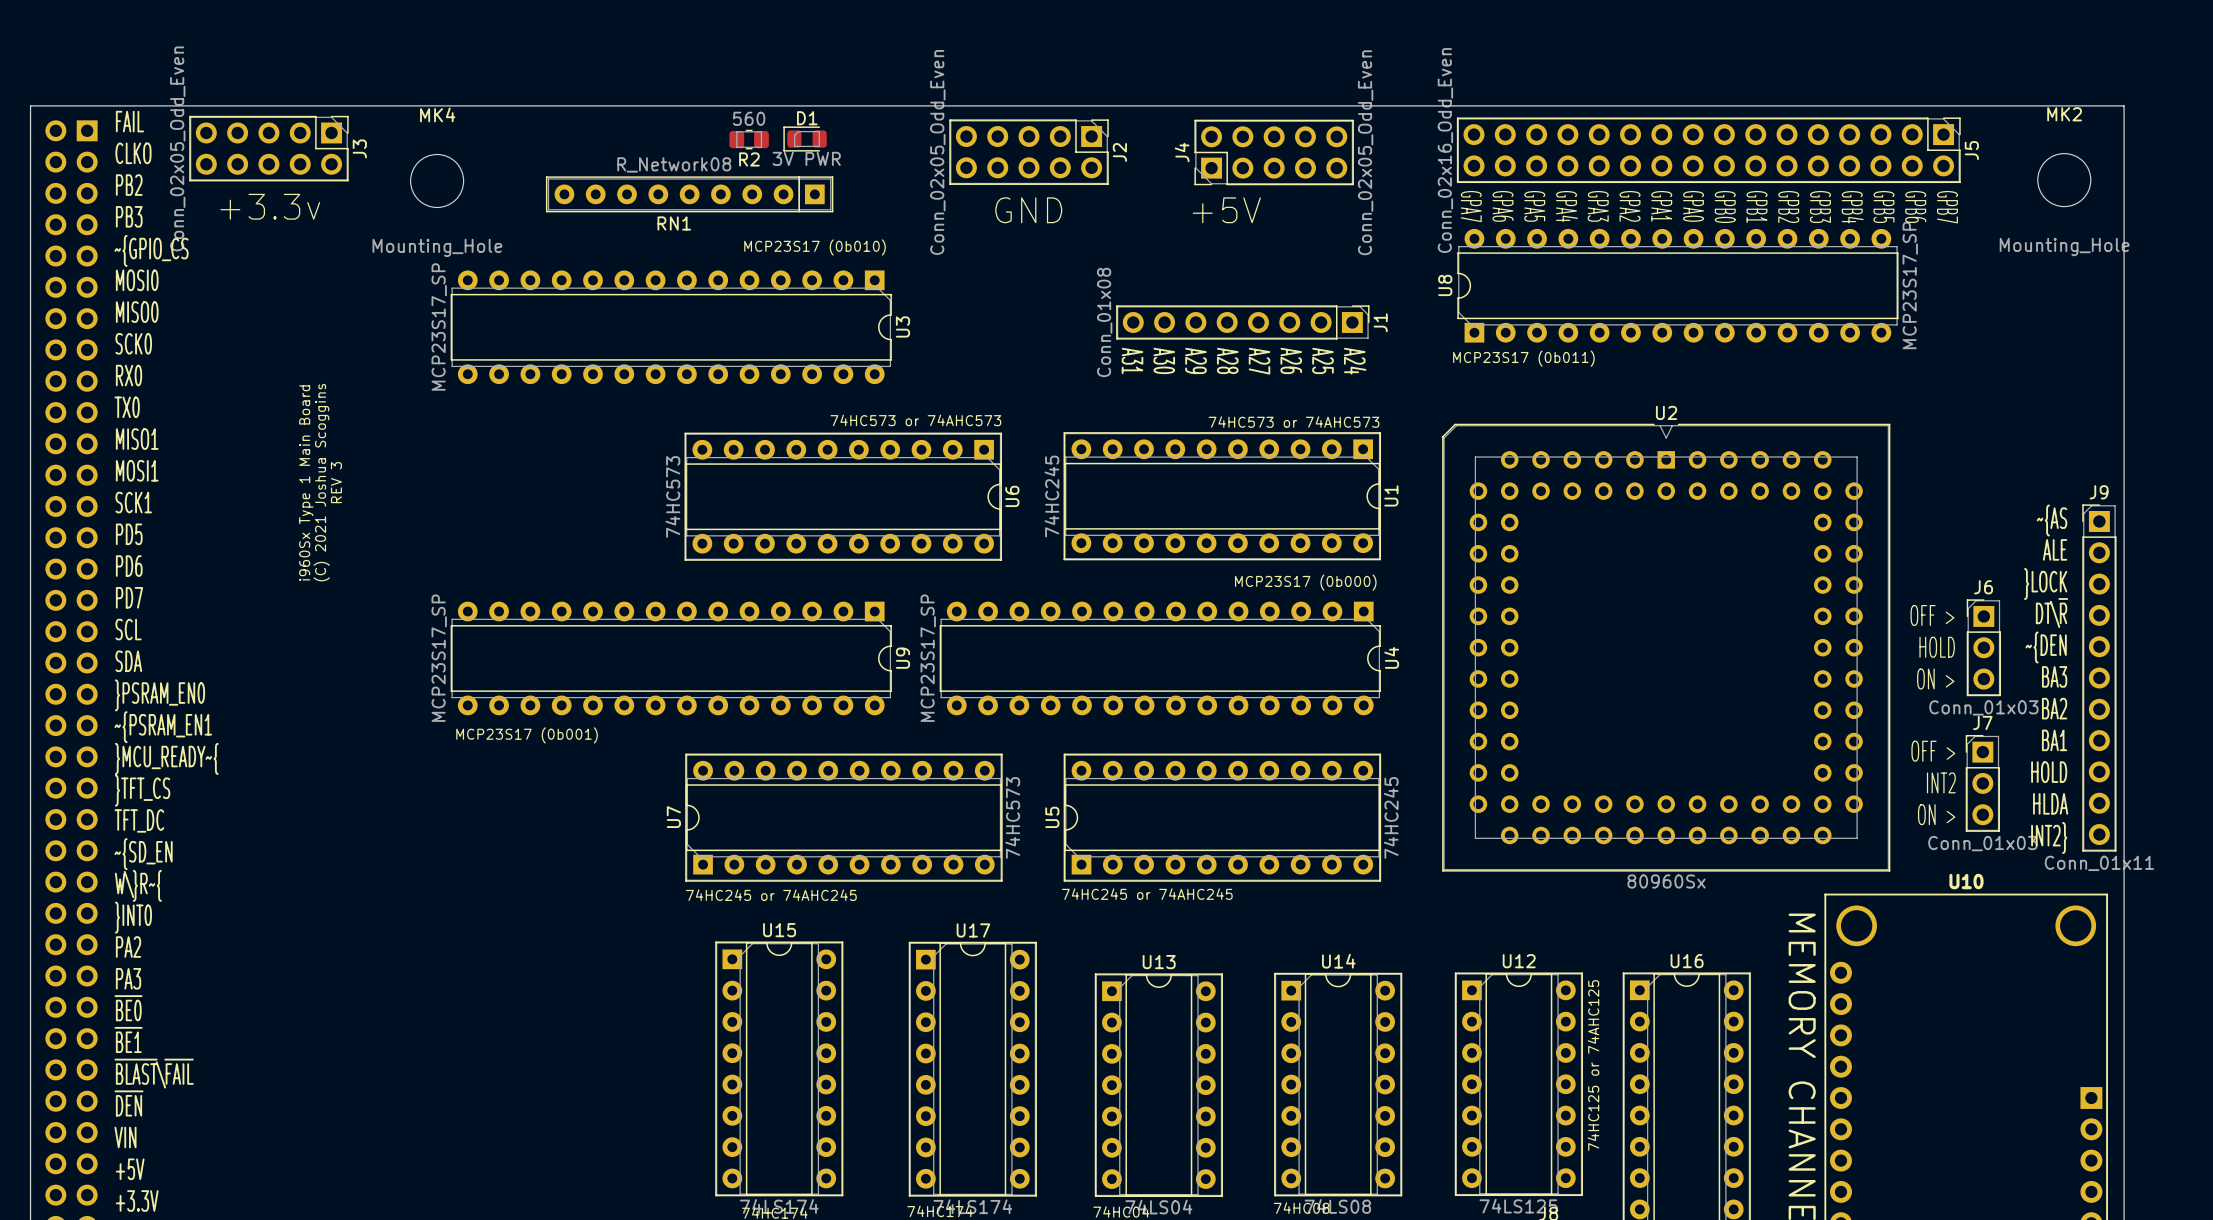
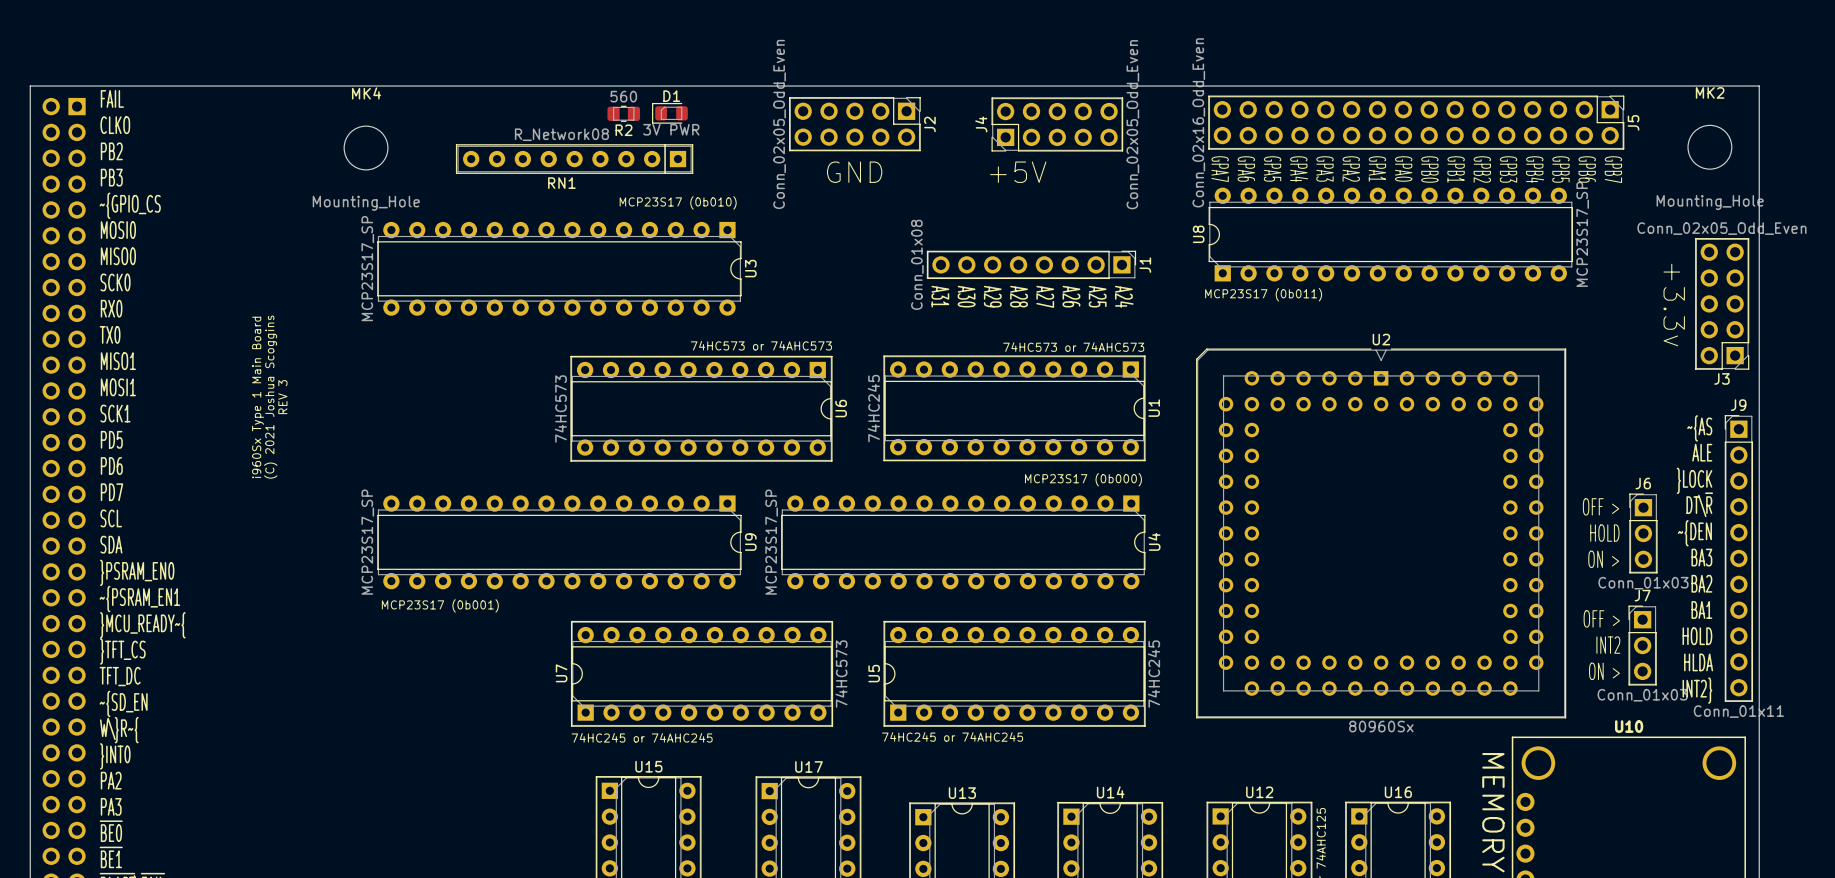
J3 rotation: 0° (268, 148) -> 90° clockwise (1722, 303)
J3 position: (268, 148) -> (1722, 303)
text: +3.3v (270, 206) -> none
text: none -> +3.3v (1674, 305)

